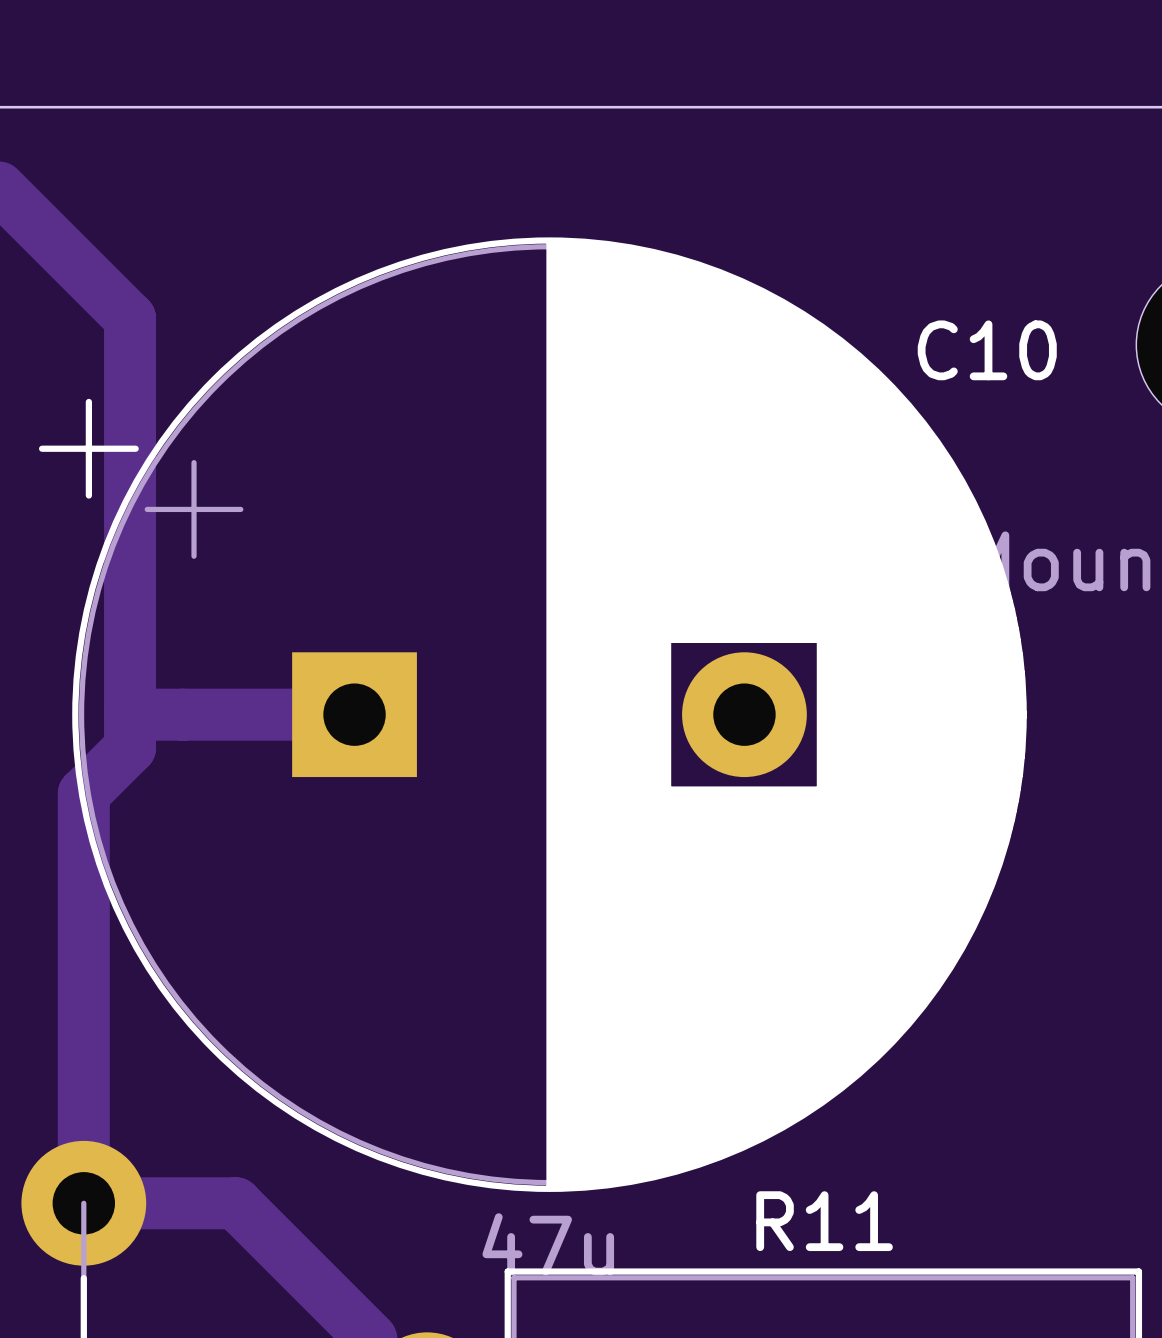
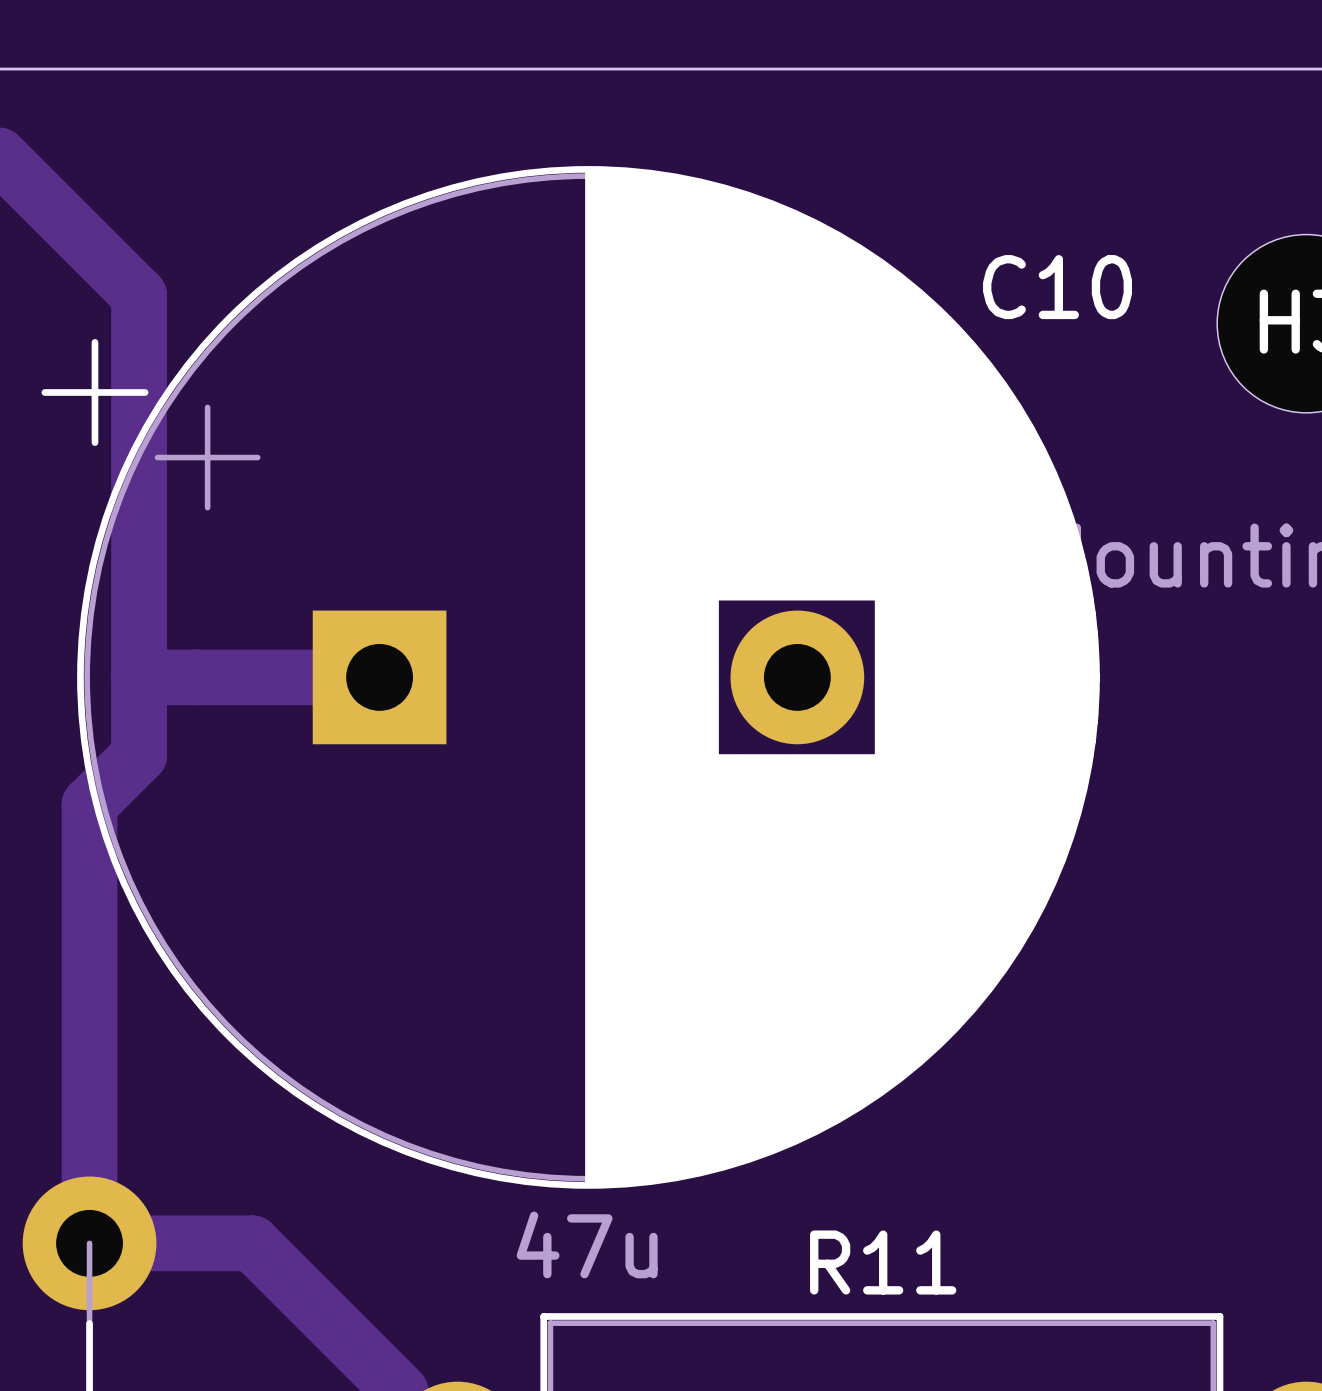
track: (130, 714) (354, 714) -> (139, 677) (379, 677)
C10 position: (532, 714) -> (570, 677)

